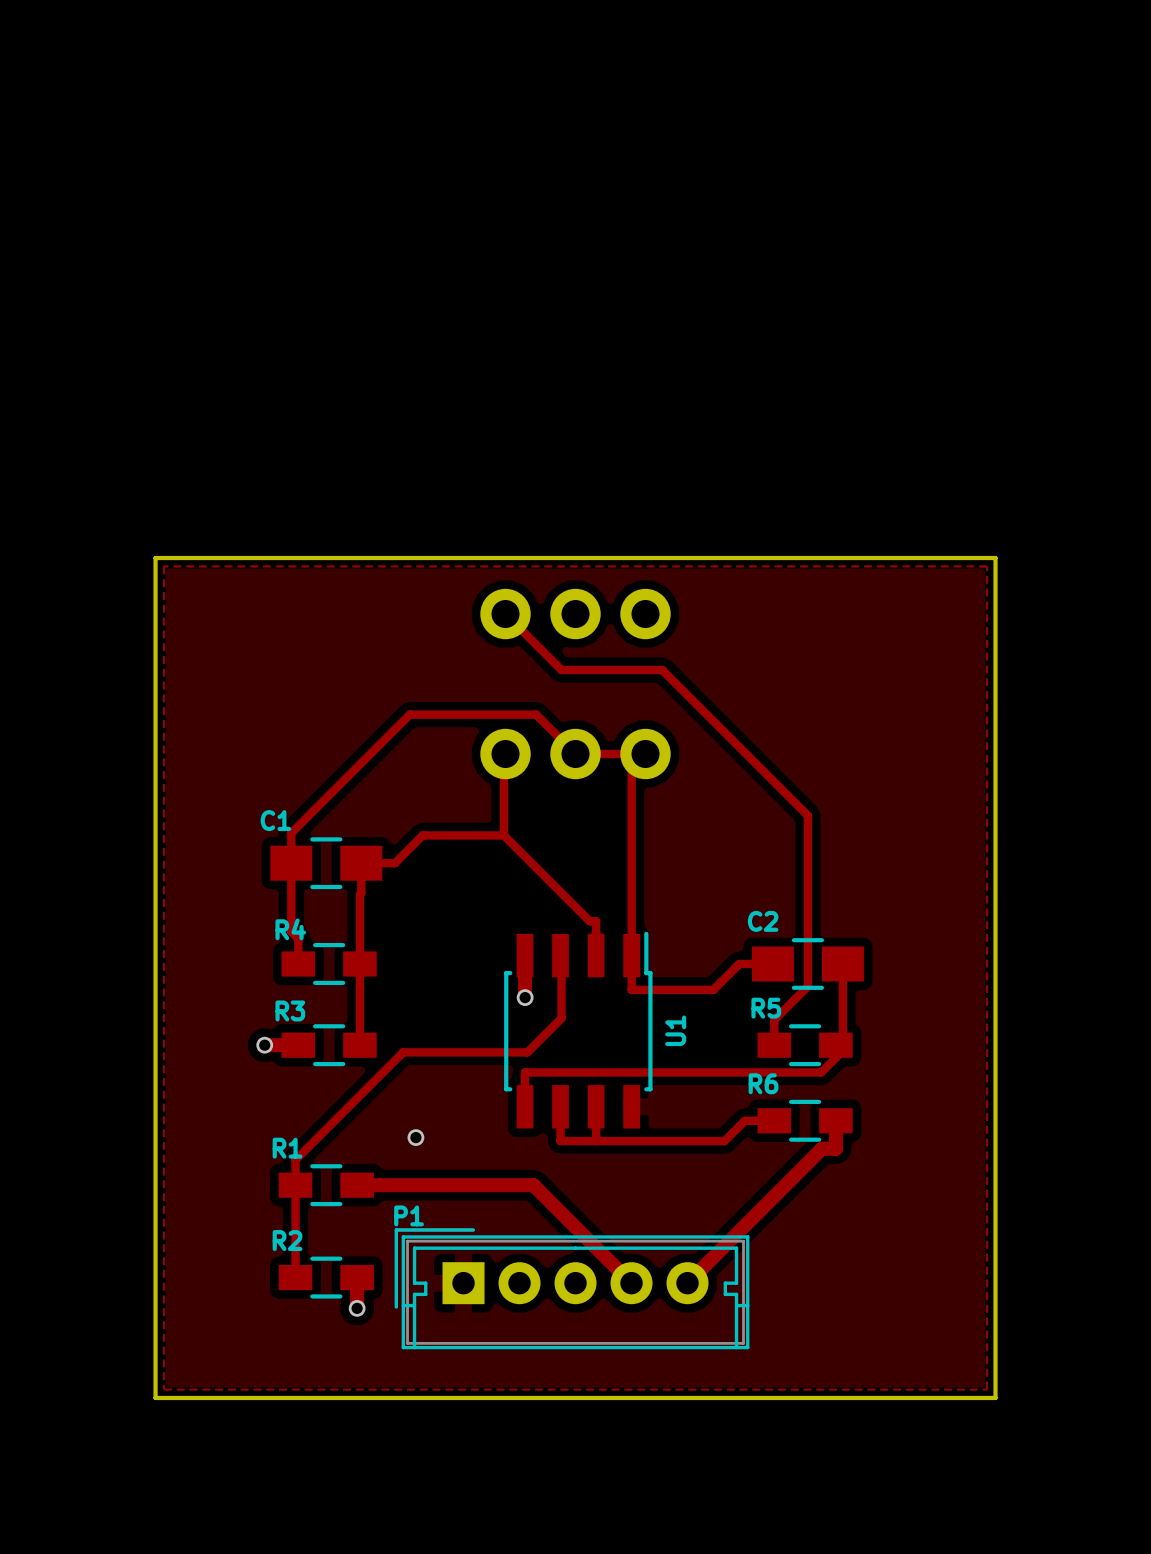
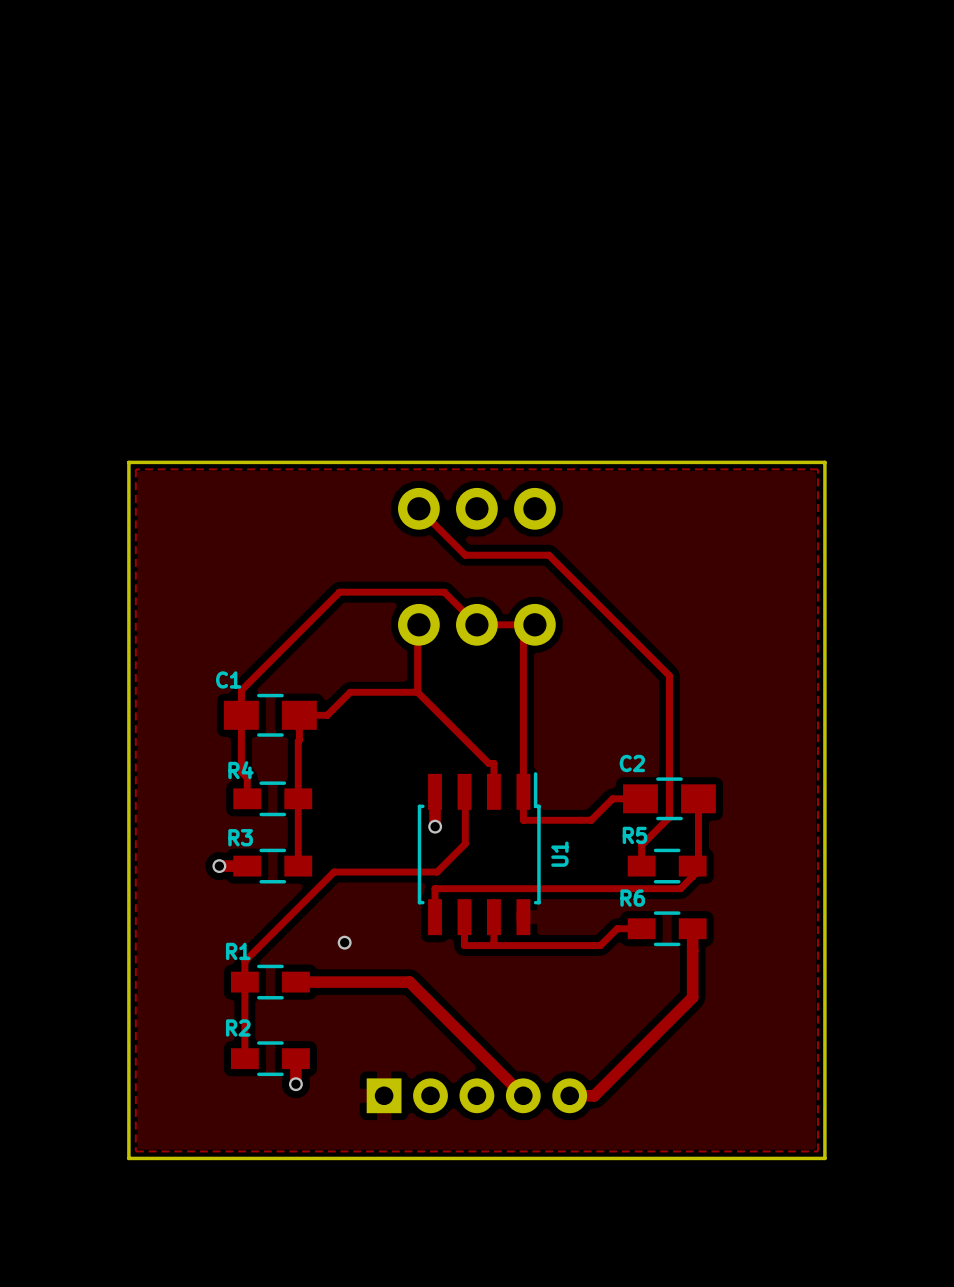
track: (835, 1148) (821, 1148) (687, 1283) -> (692, 951) (692, 997) (594, 1095) (569, 1095)
track: (494, 1185) (533, 1185) (631, 1283) -> (409, 982) (523, 1095)
P1 side: top (572, 1288) -> bottom (476, 1095)

